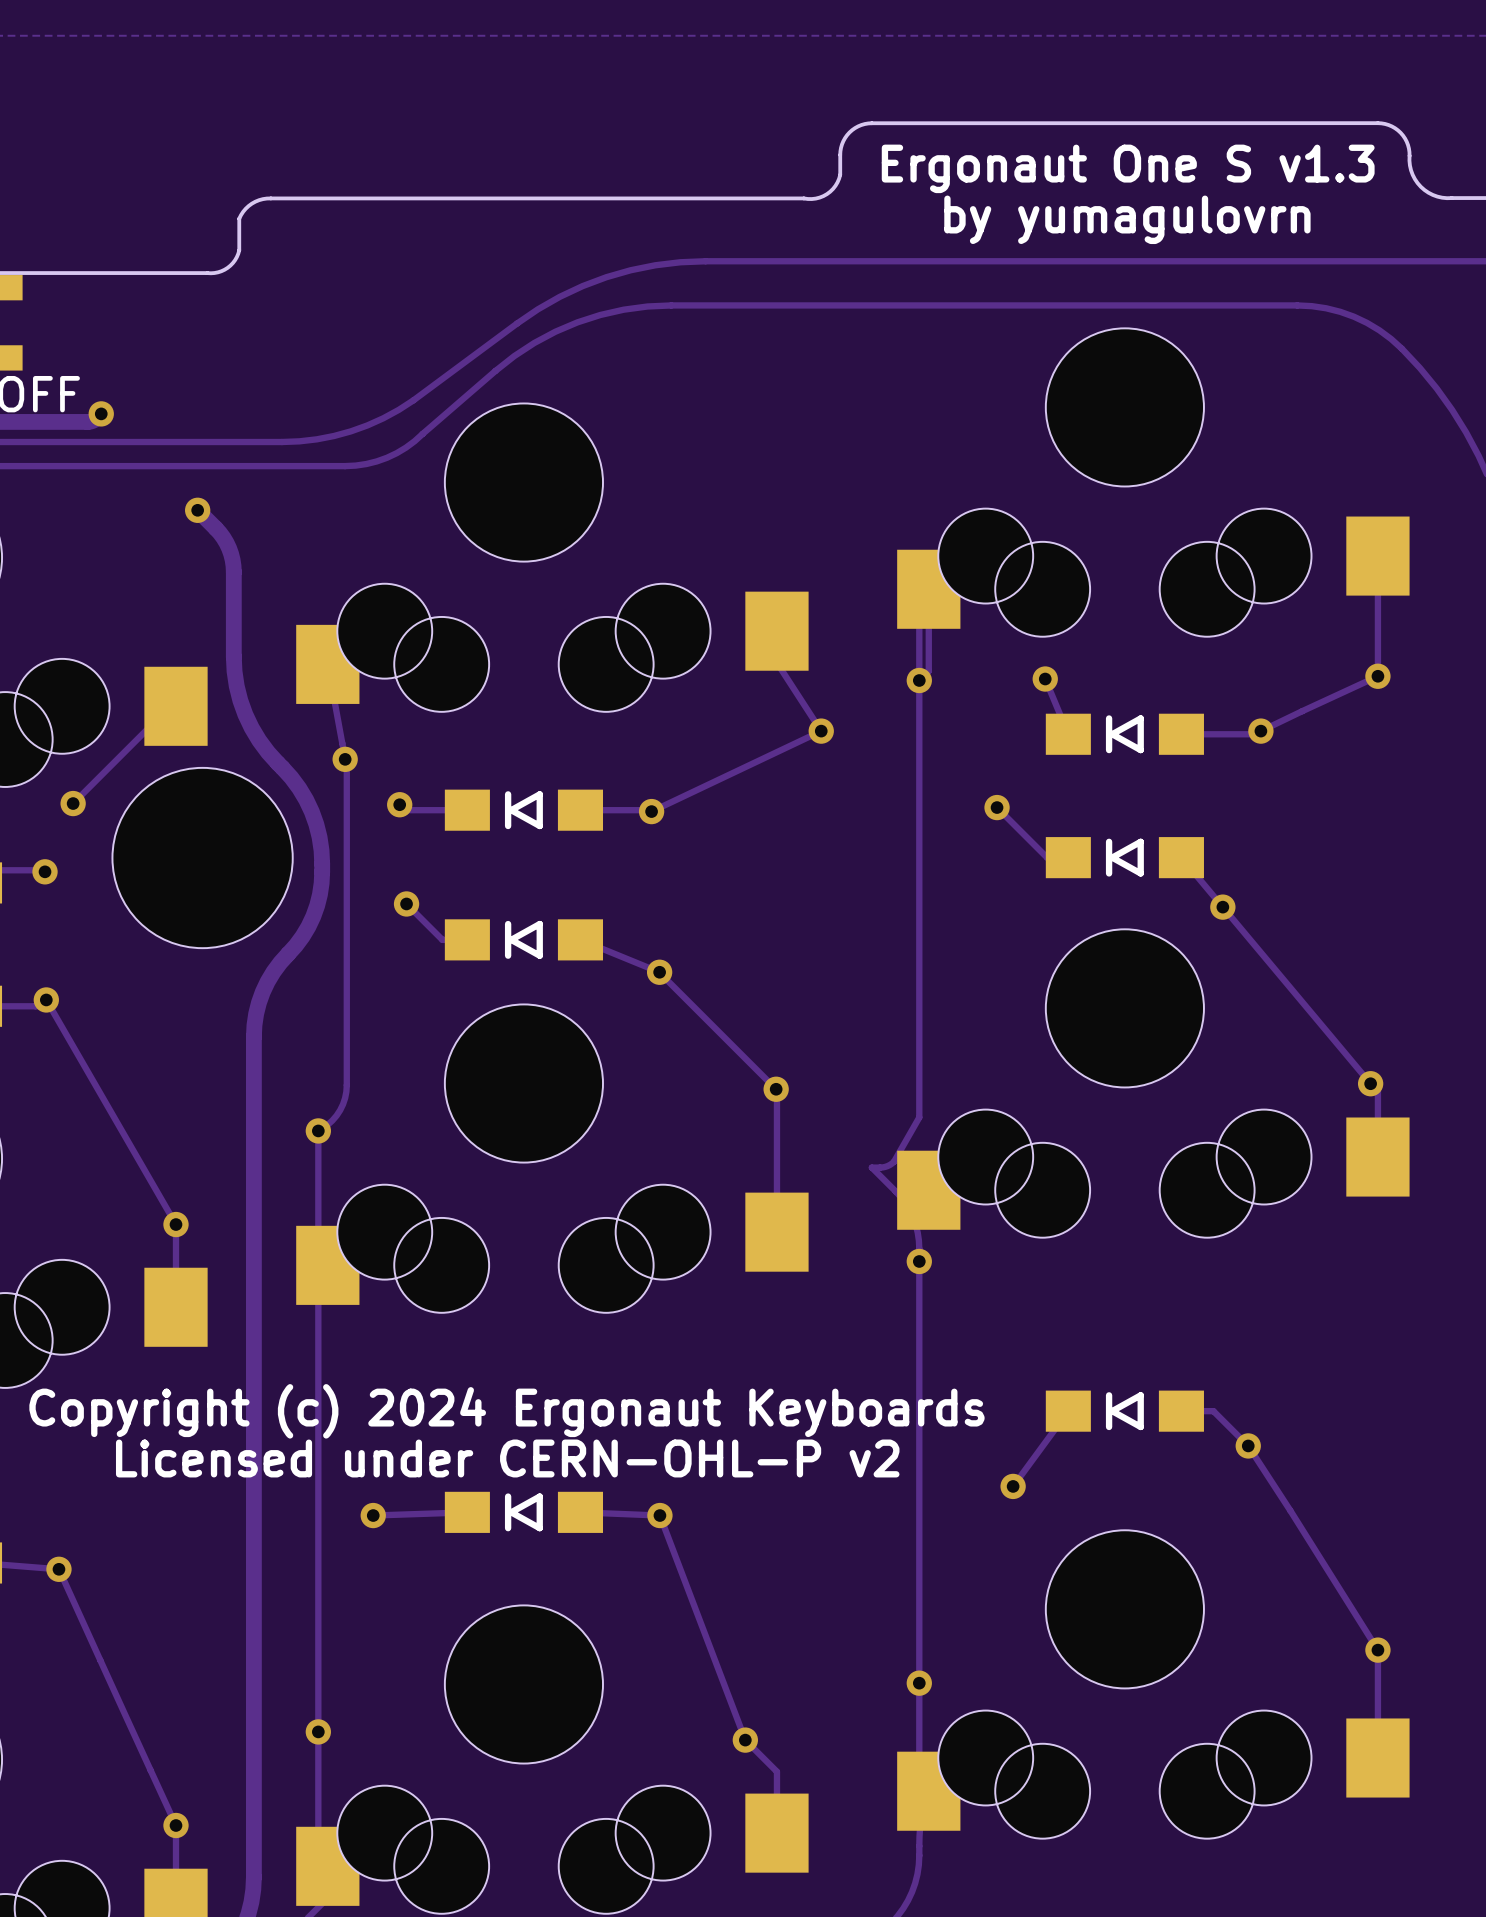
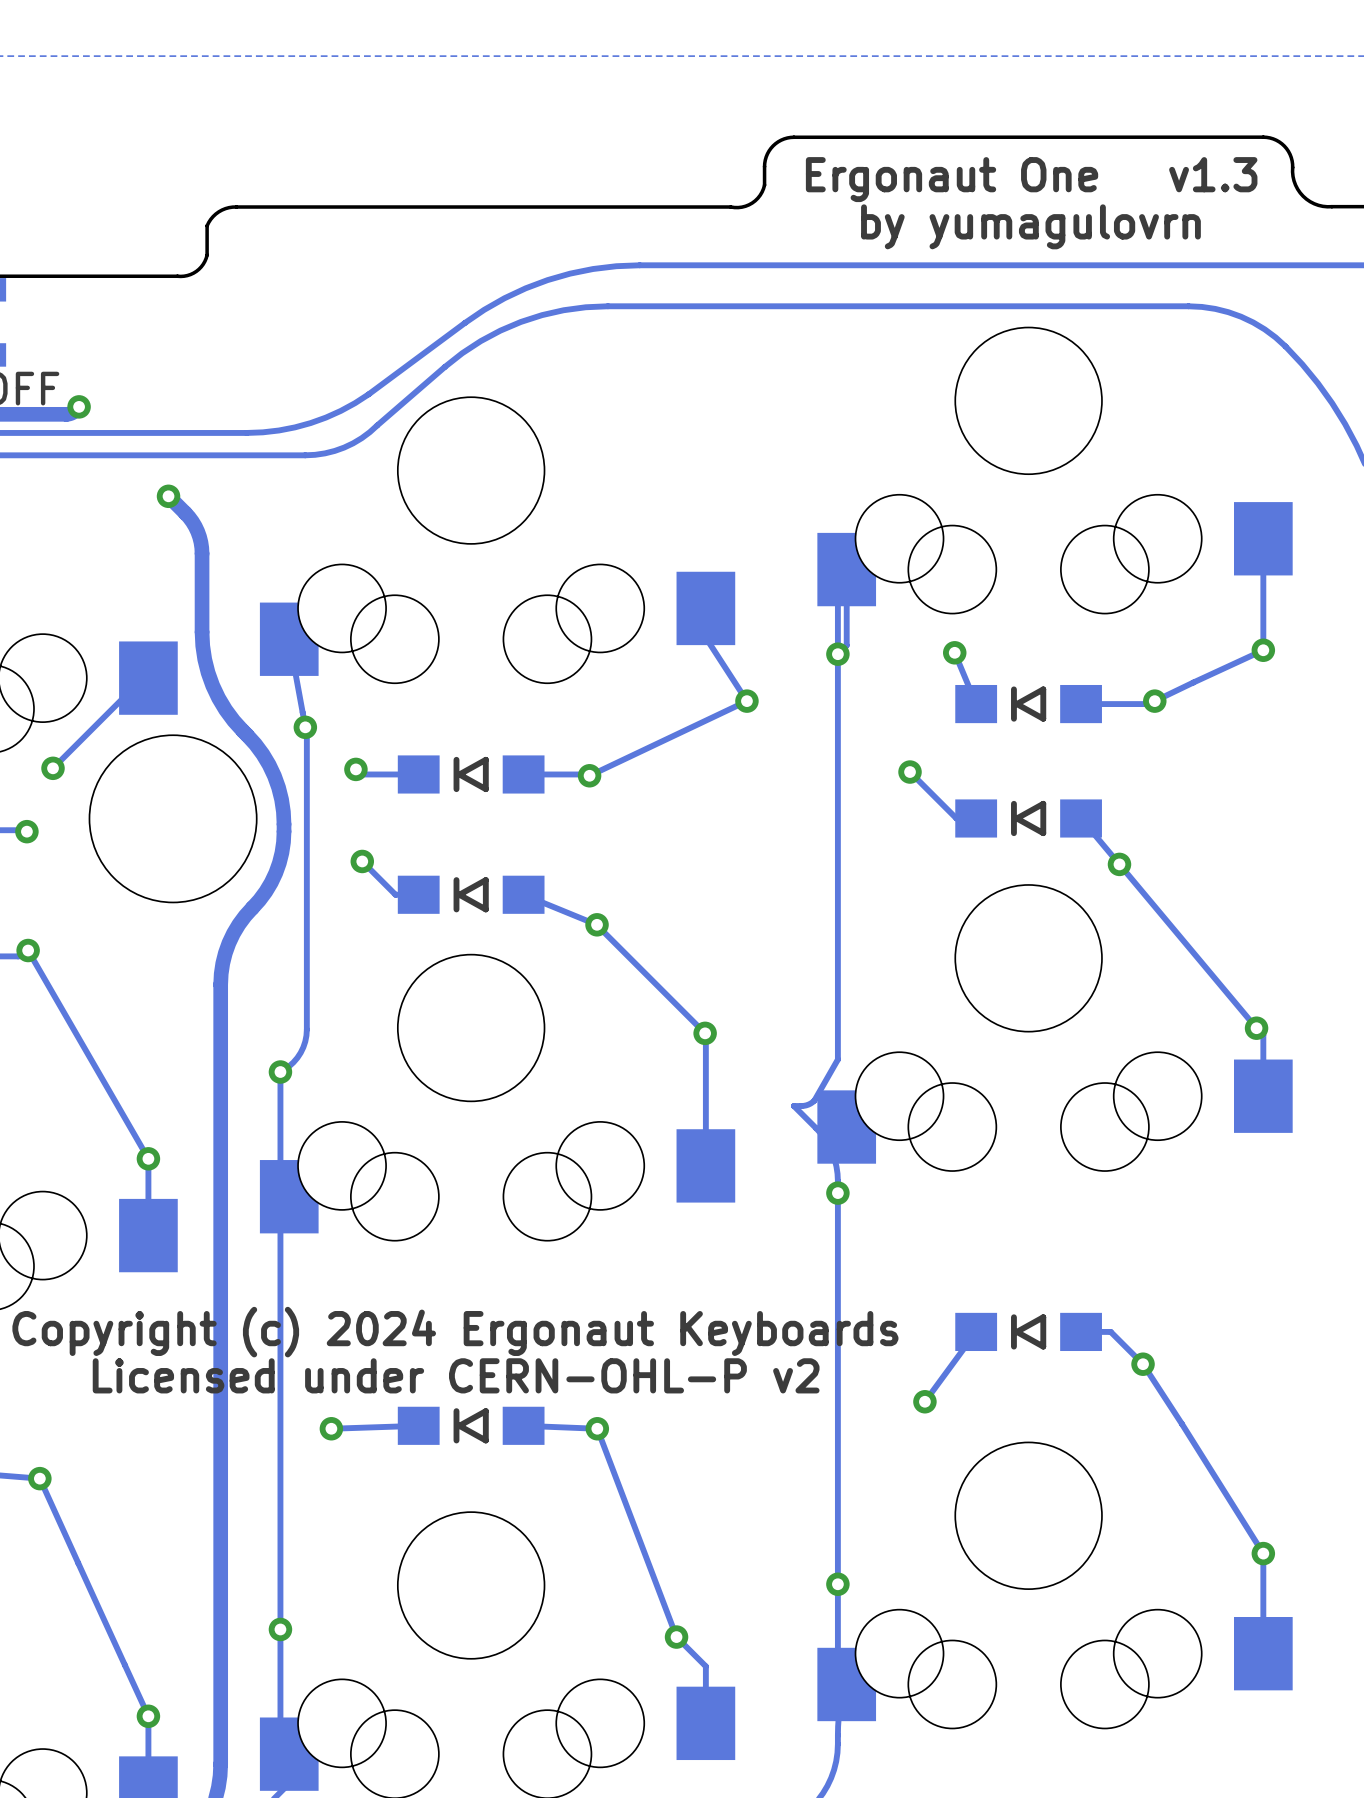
text: Ergonaut One S v1.3 (1128, 168) -> Ergonaut One v1.3 (1031, 179)

